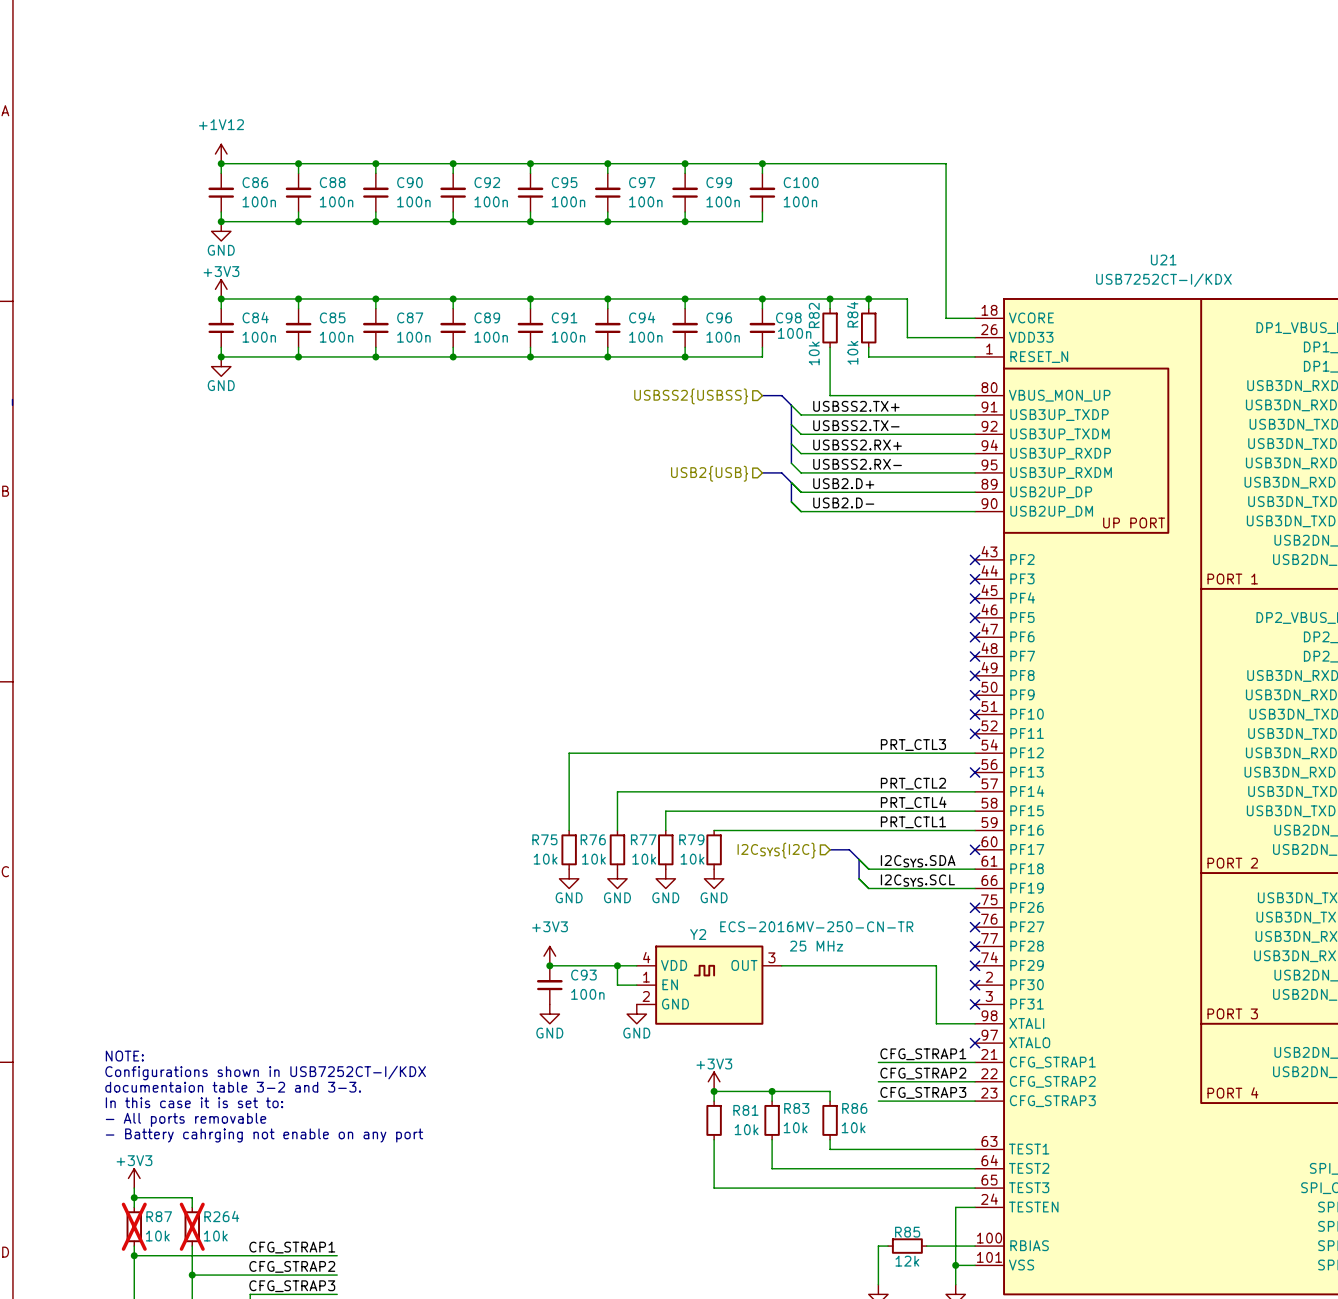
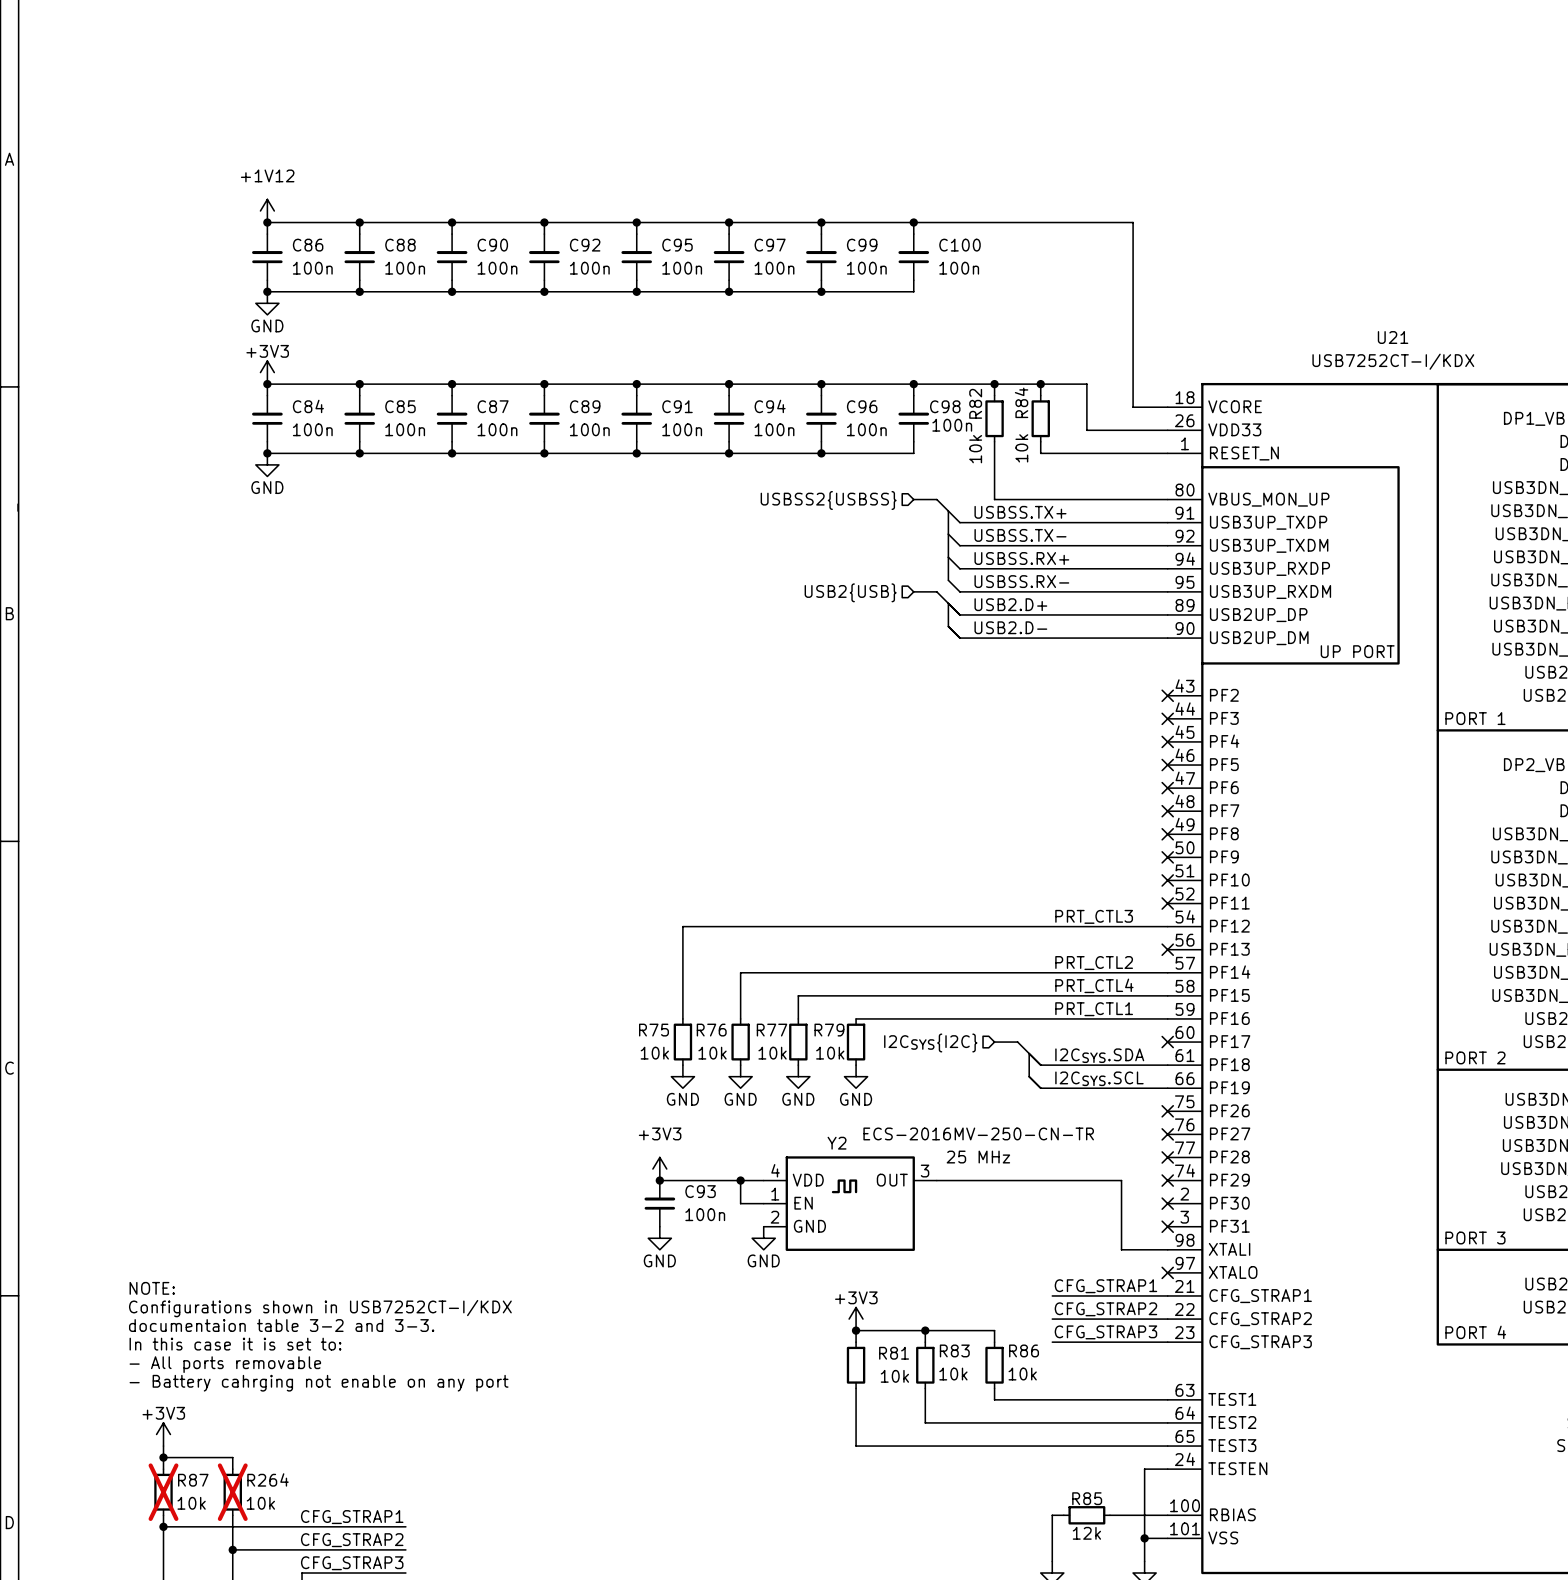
label: USBSS2.TX+ (856, 406) -> USBSS.TX+ (1020, 512)
label: USBSS2.TX- (856, 425) -> USBSS.TX- (1020, 535)
label: USBSS2.RX+ (857, 444) -> USBSS.RX+ (1021, 558)
label: USBSS2.RX- (857, 464) -> USBSS.RX- (1021, 581)

